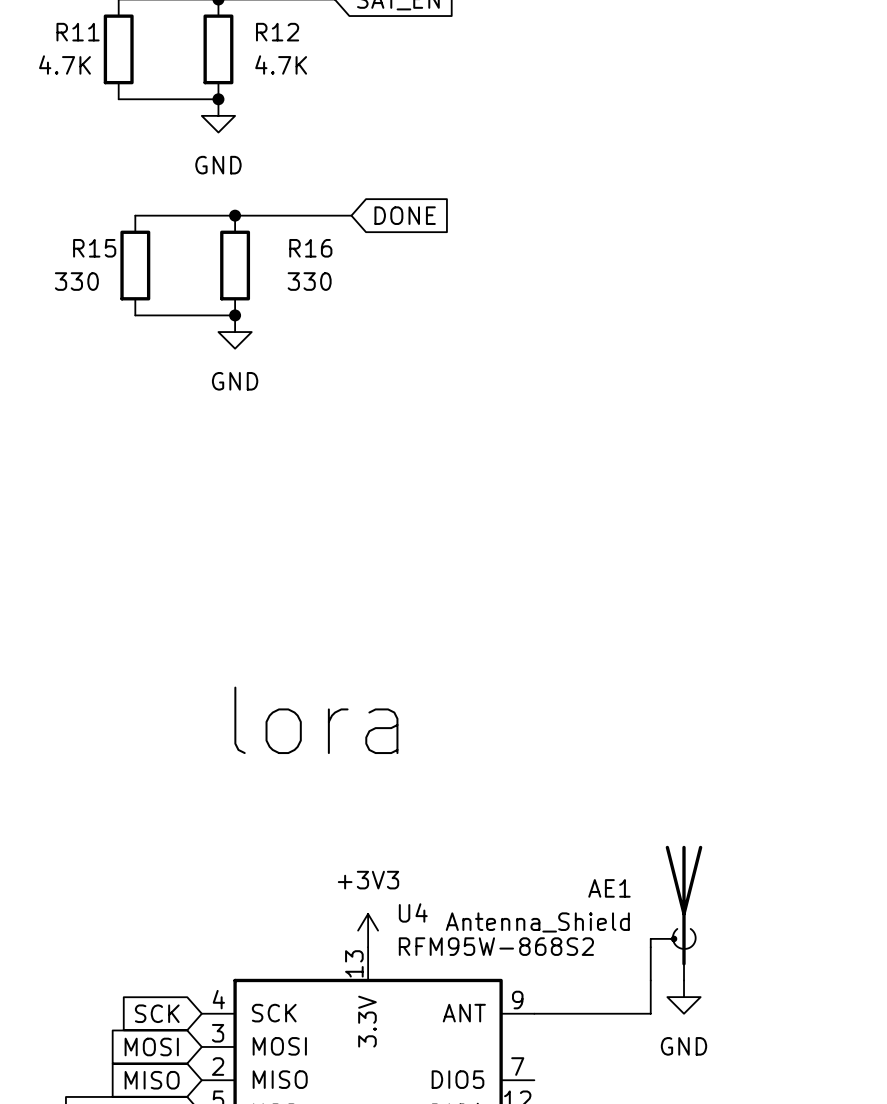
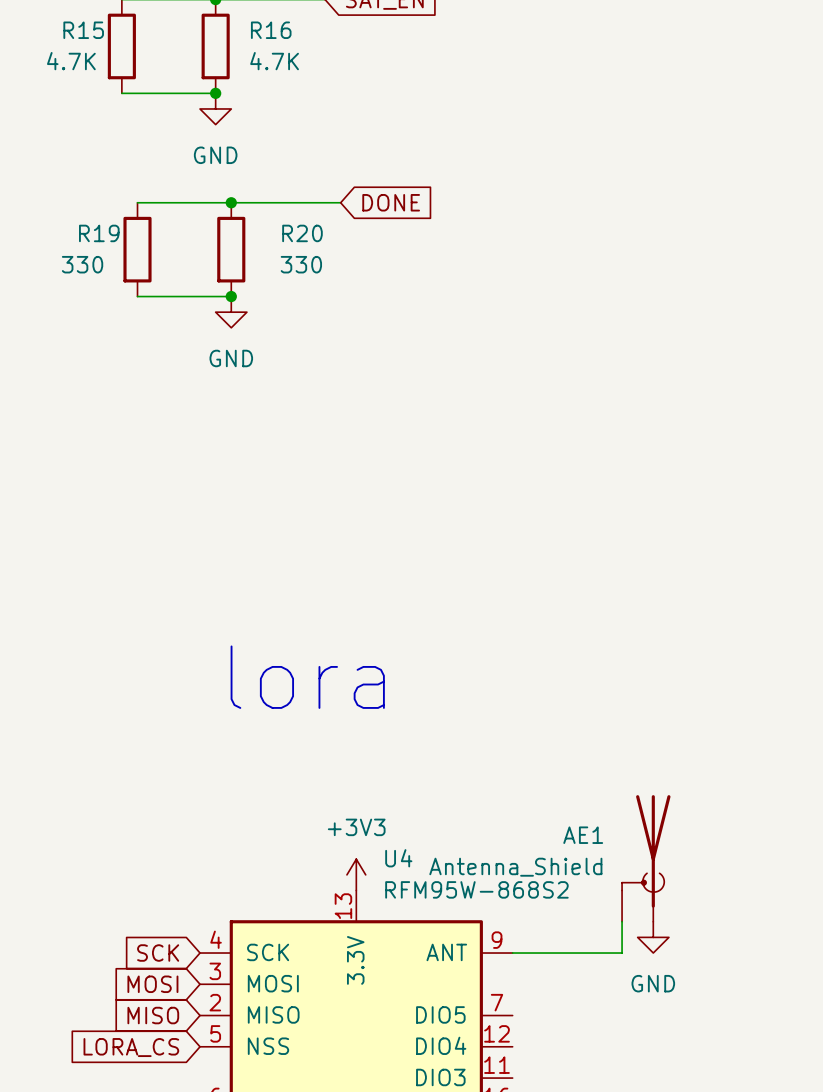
R11 name: R11 (78, 32) -> R15 (83, 30)
R12 name: R12 (277, 32) -> R16 (271, 30)
R15 name: R15 (94, 248) -> R19 (99, 233)
R16 name: R16 (310, 248) -> R20 (302, 233)

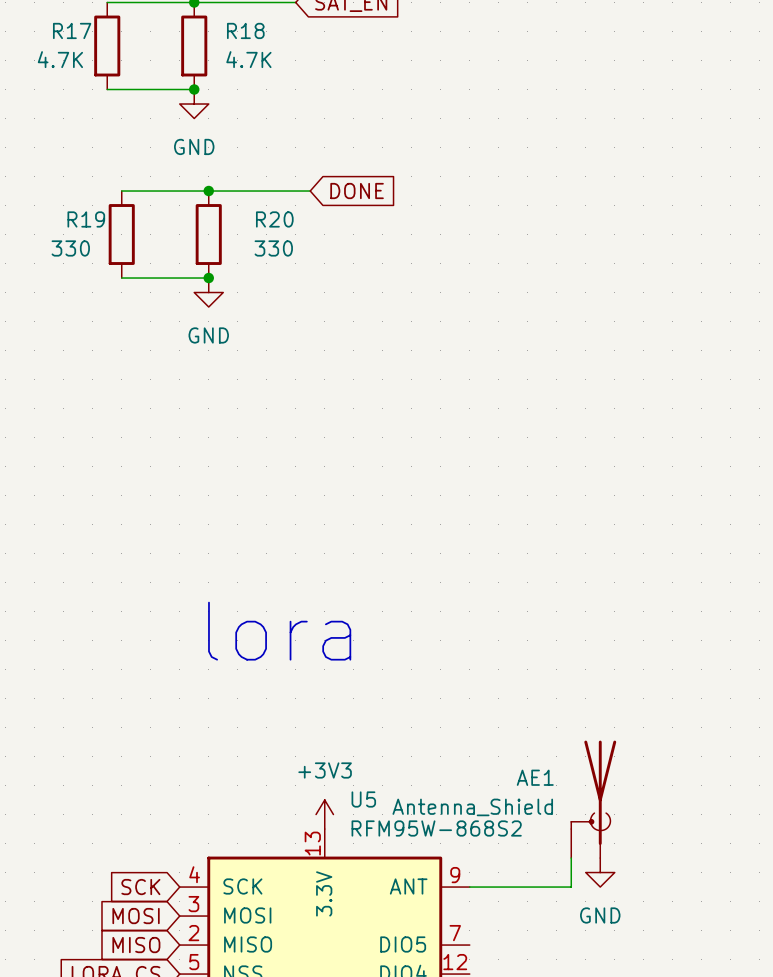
R15 name: R15 (83, 30) -> R17 (72, 30)
R16 name: R16 (271, 30) -> R18 (245, 30)
U4 name: U4 (398, 858) -> U5 (363, 799)

